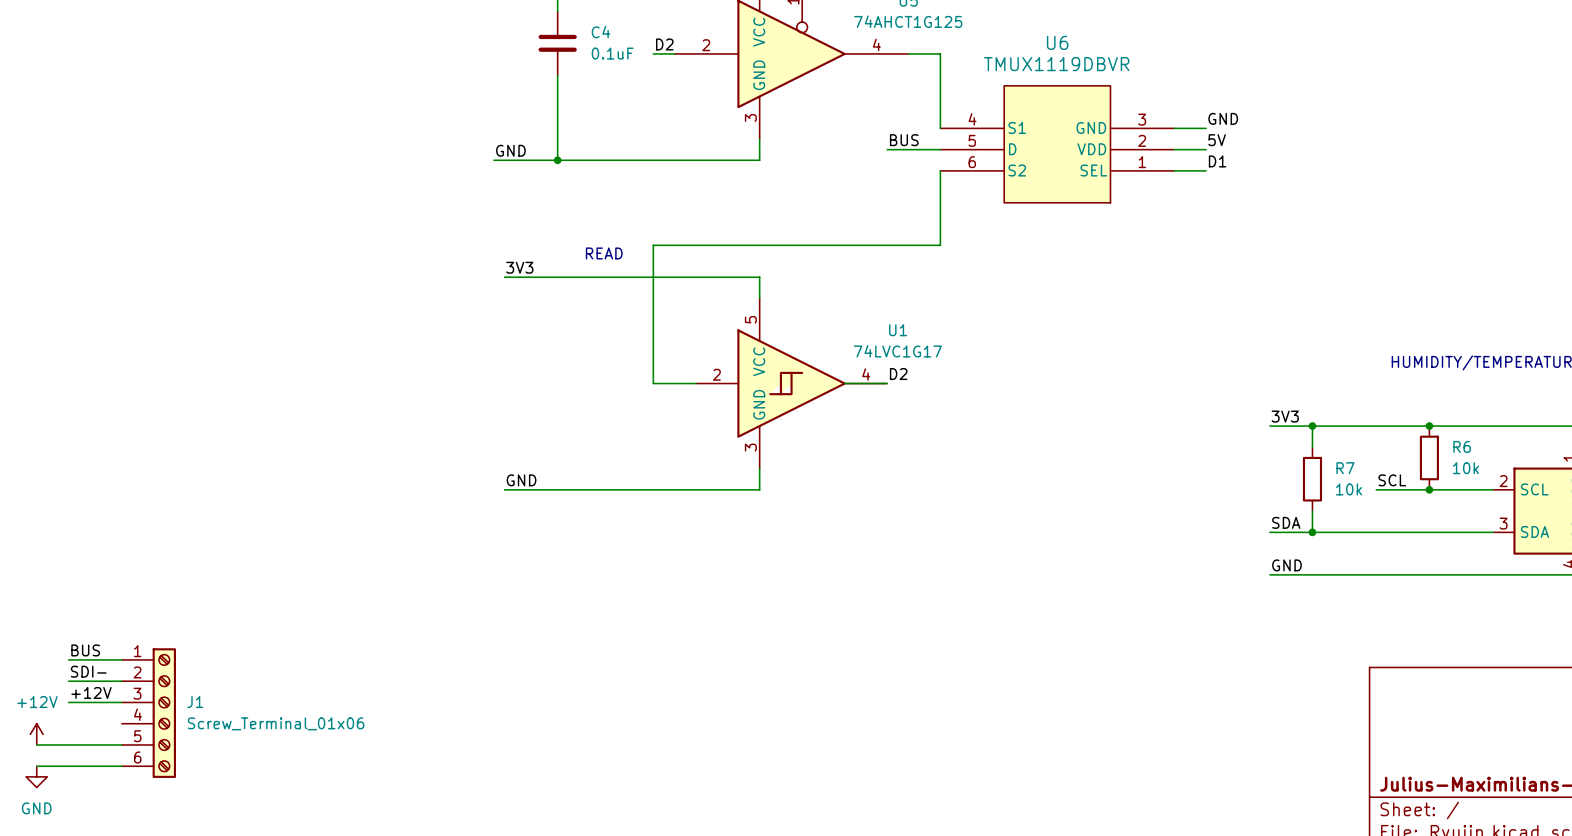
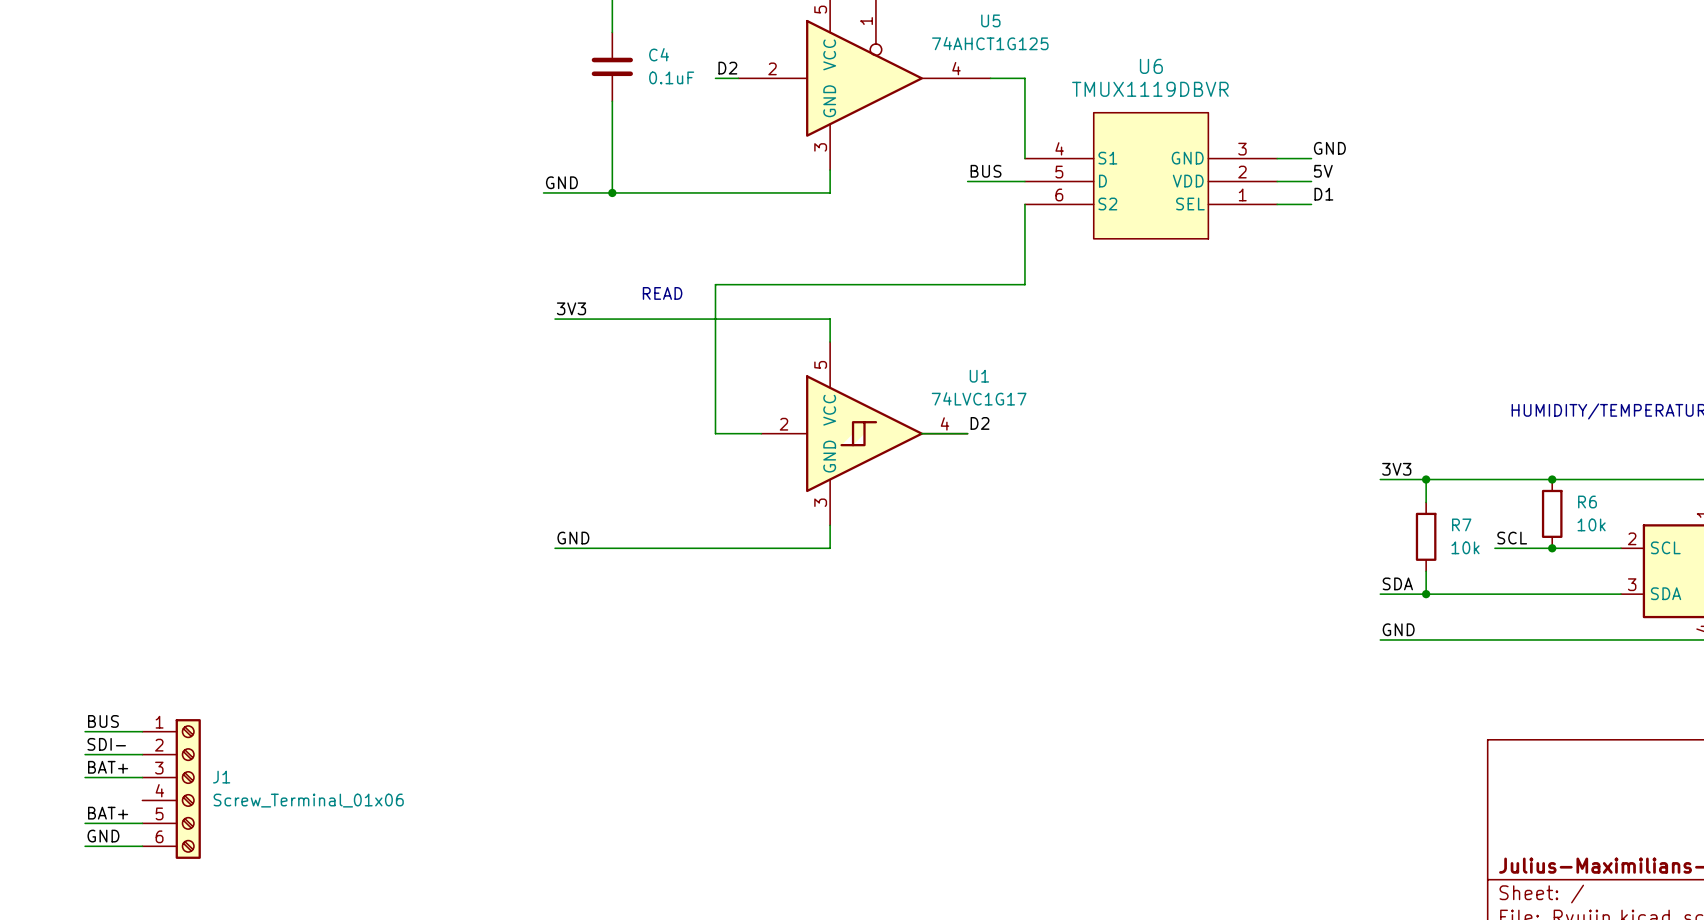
label: +12V (91, 692) -> BAT+ (108, 767)
power symbol: +12V (36, 734) -> none
label: none -> BAT+ (108, 813)
wire: (36, 744) (68, 744) -> none
label: none -> GND (103, 836)
wire: (36, 766) (68, 766) -> none
power symbol: GND (36, 776) -> none

